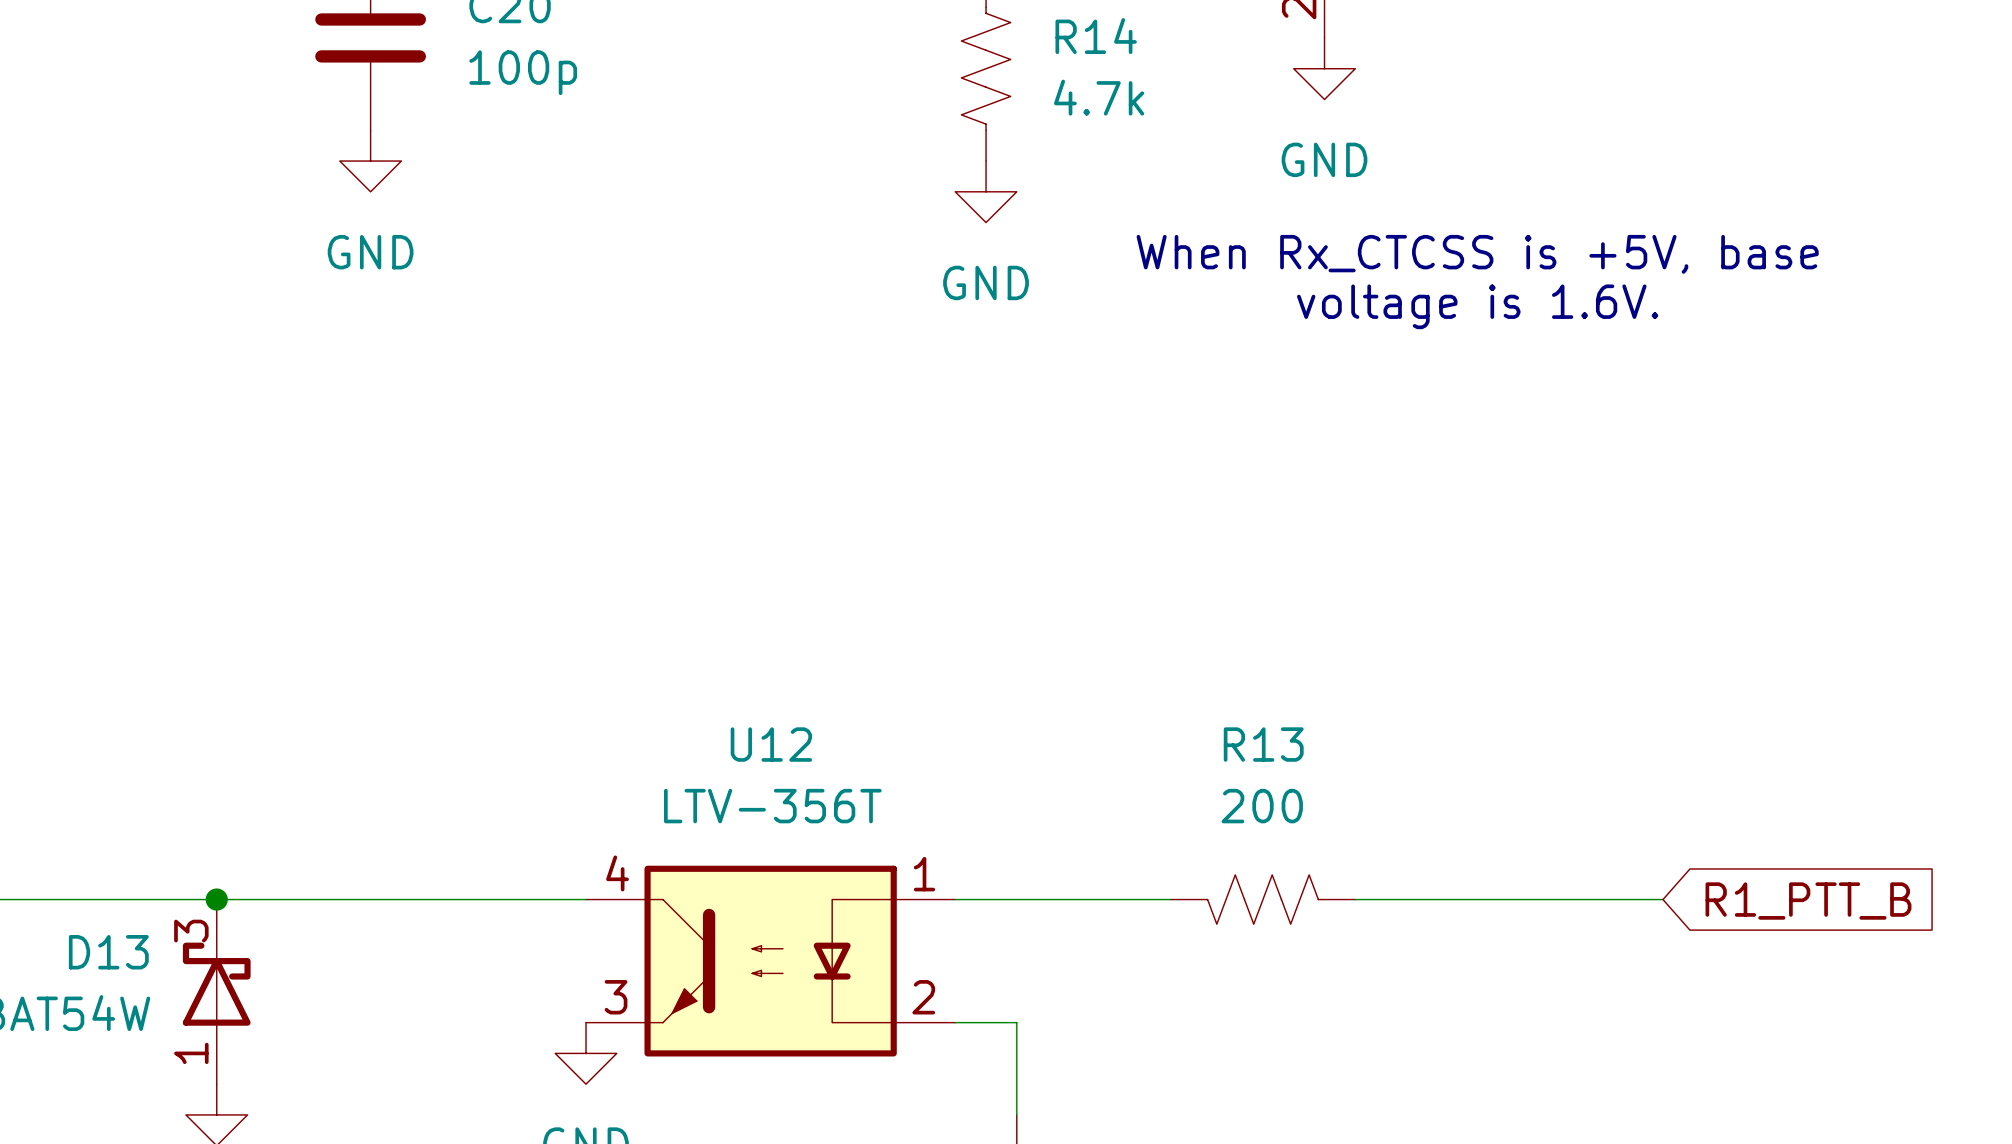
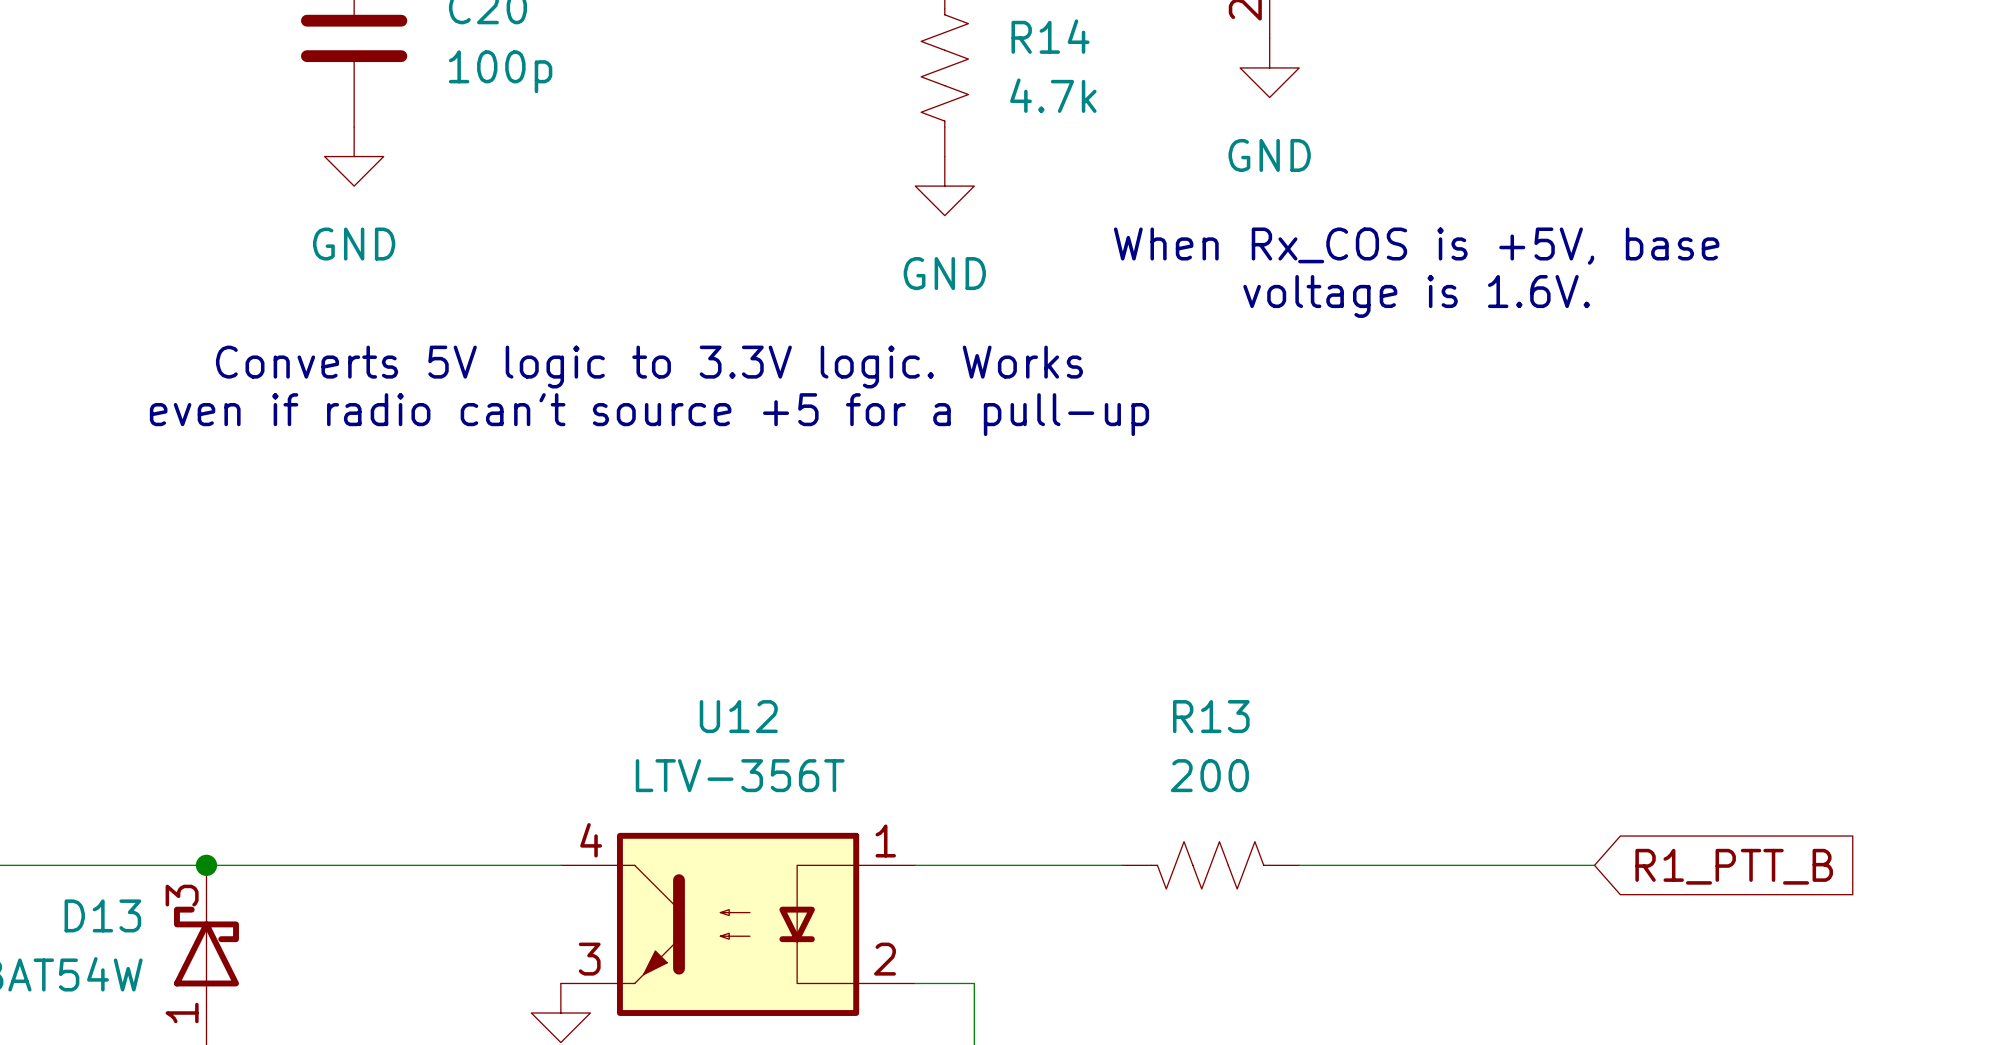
text: When Rx_CTCSS is +5V, base (1477, 254) -> When Rx_COS is +5V, base (1416, 246)
text: none -> Converts 5V logic to 3.3V logic. Works (649, 367)
text: none -> even if radio can't source +5 for a pull-up (649, 414)

